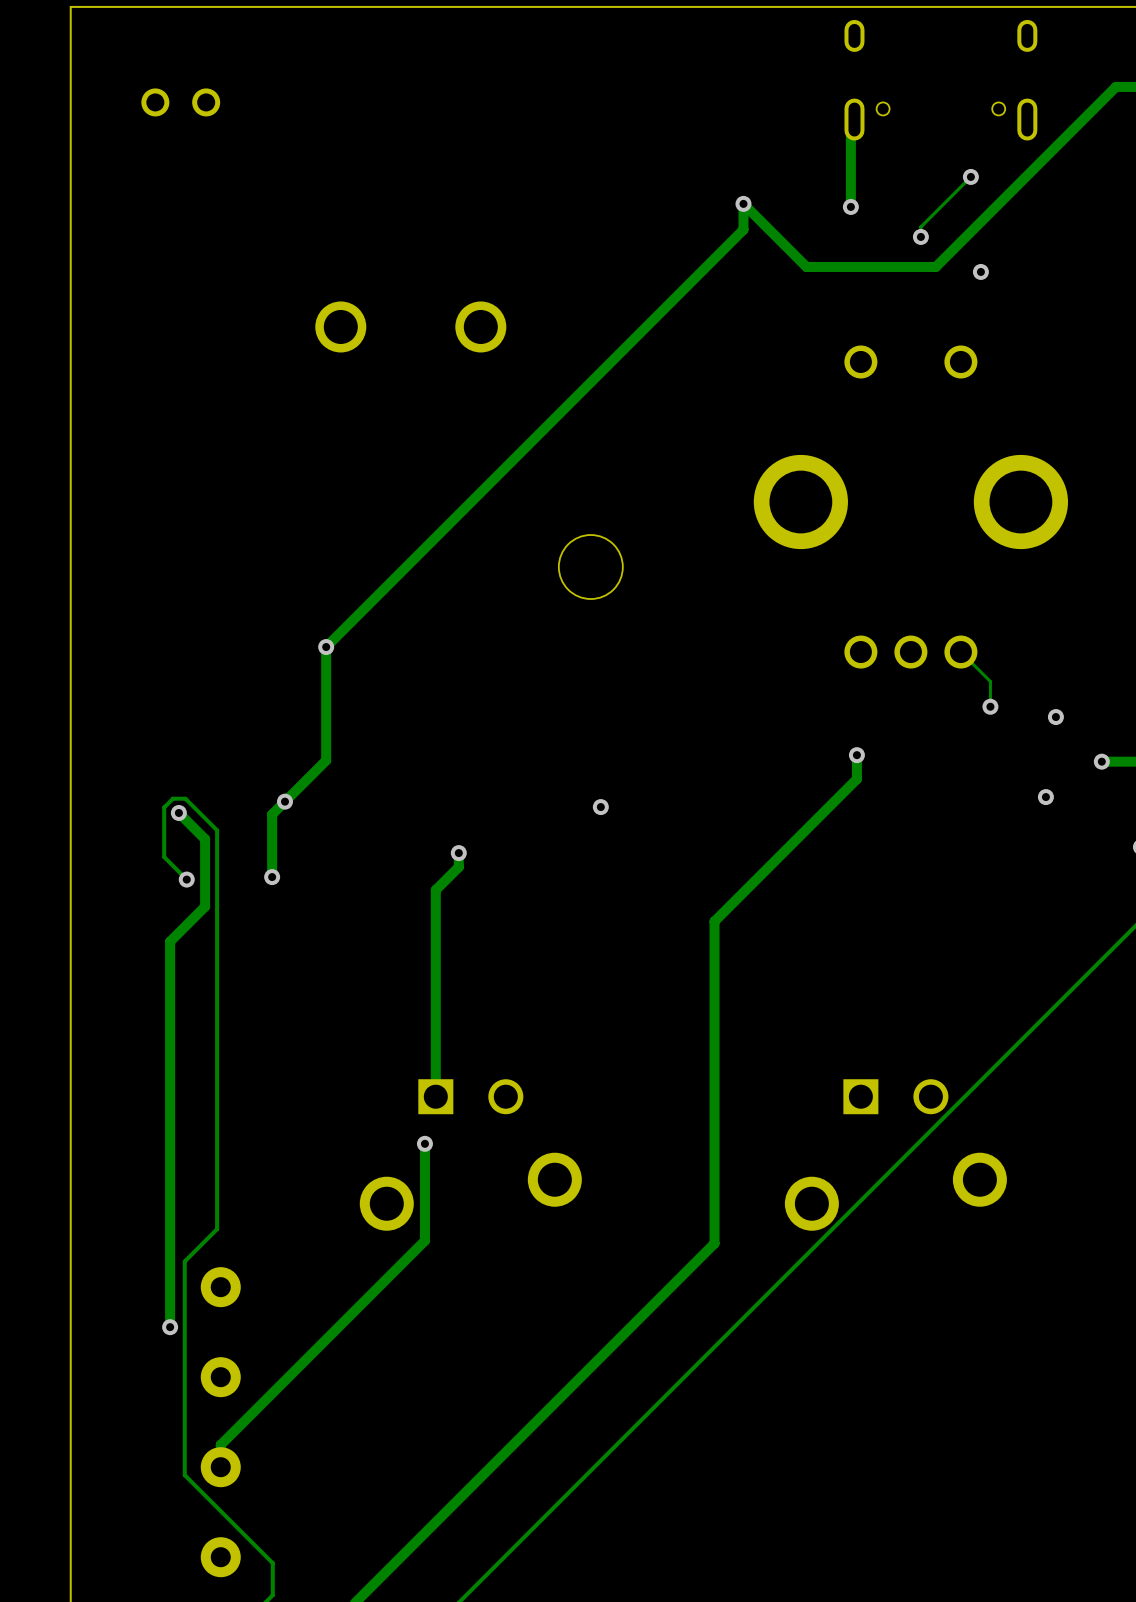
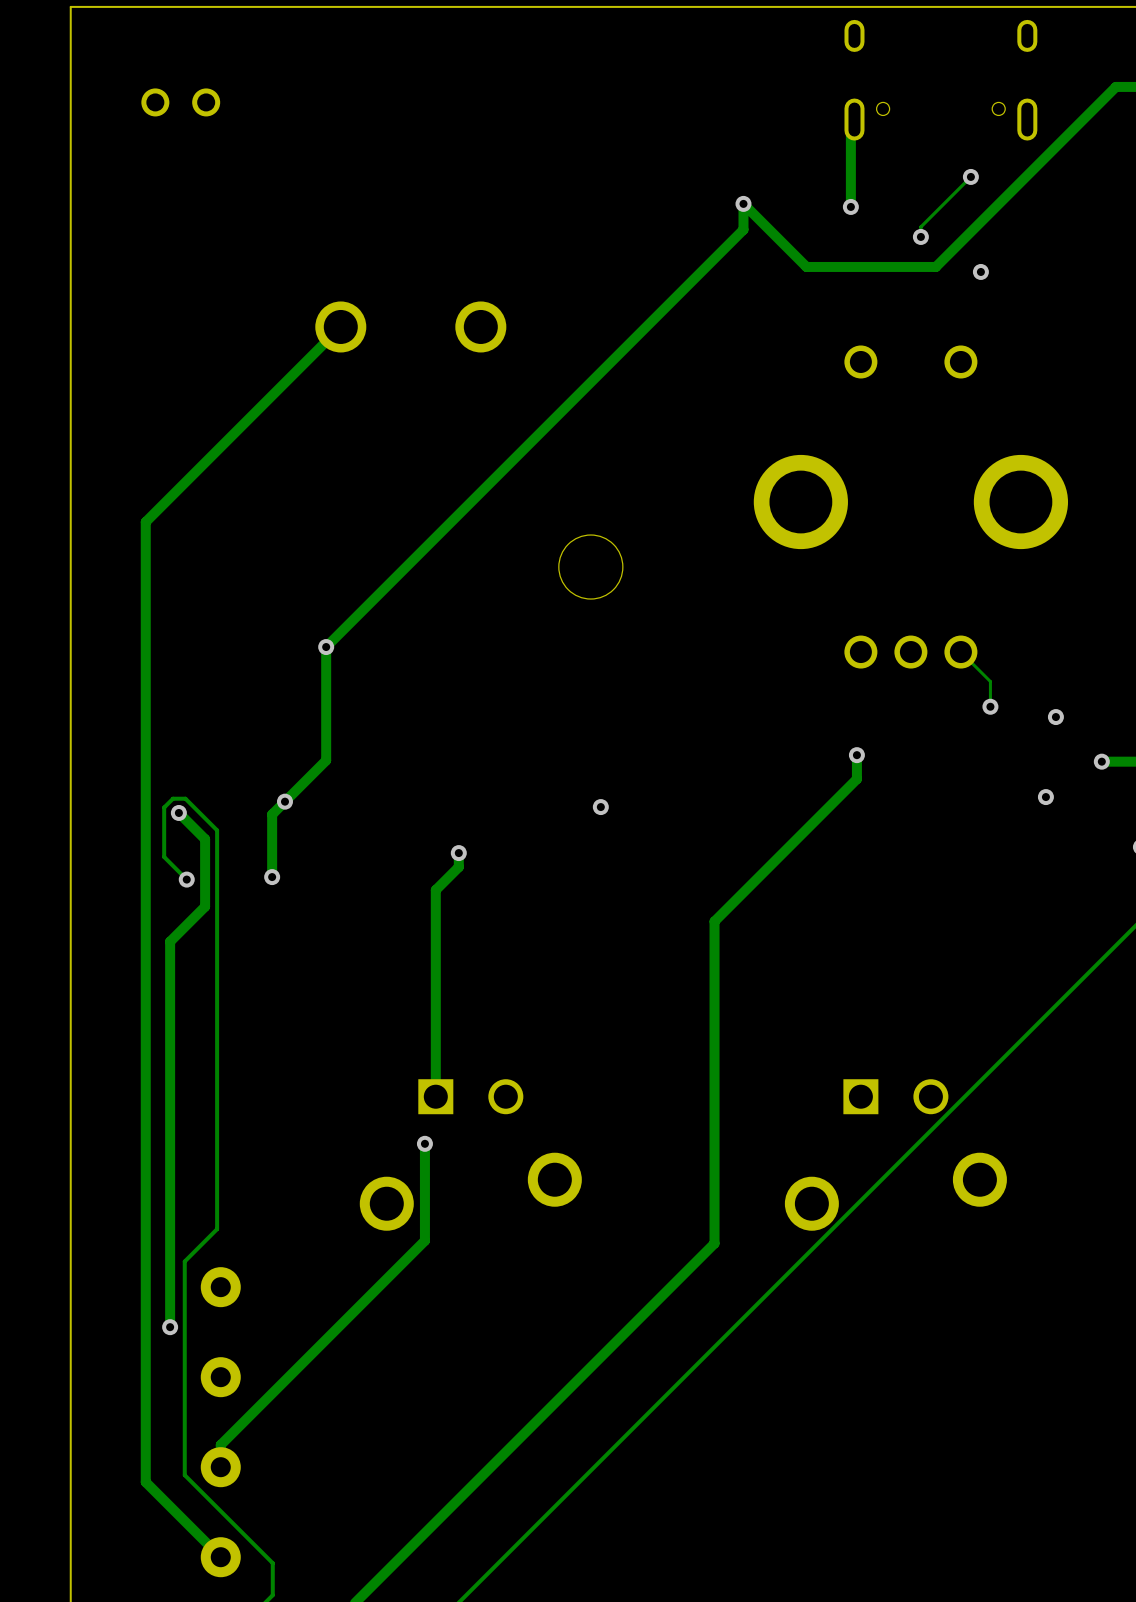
track: none -> (340, 326) (145, 522) (145, 1482) (220, 1557)

